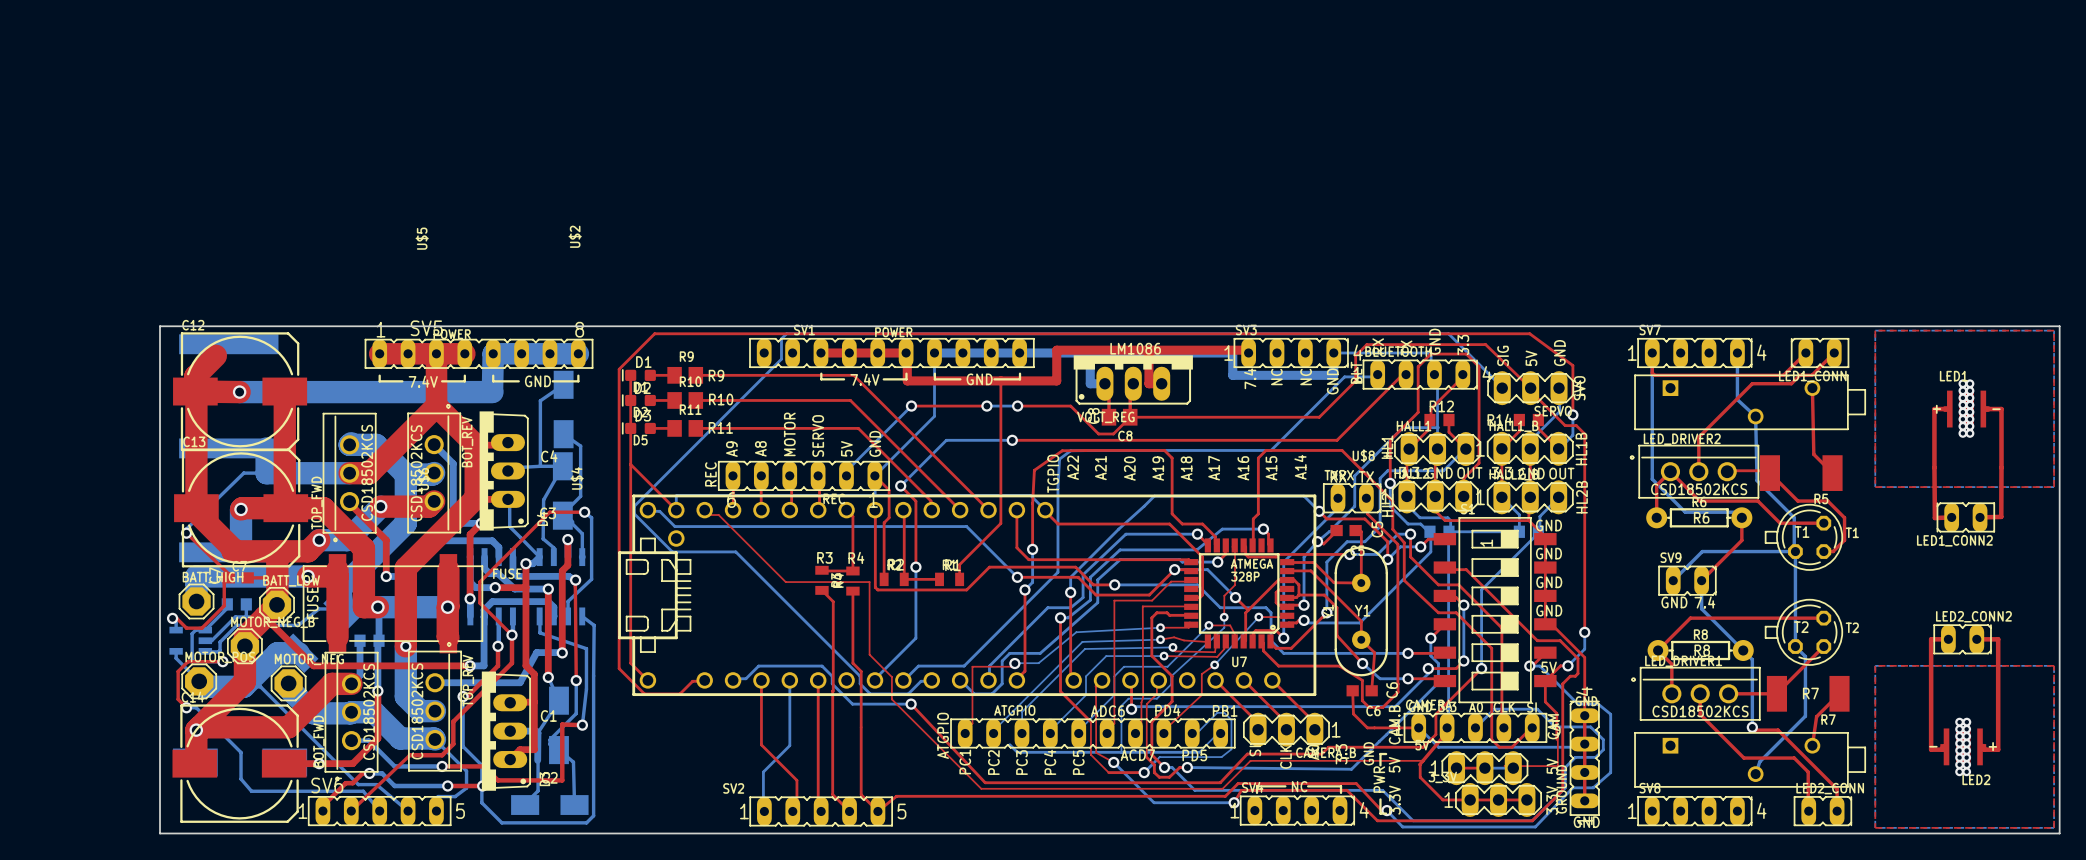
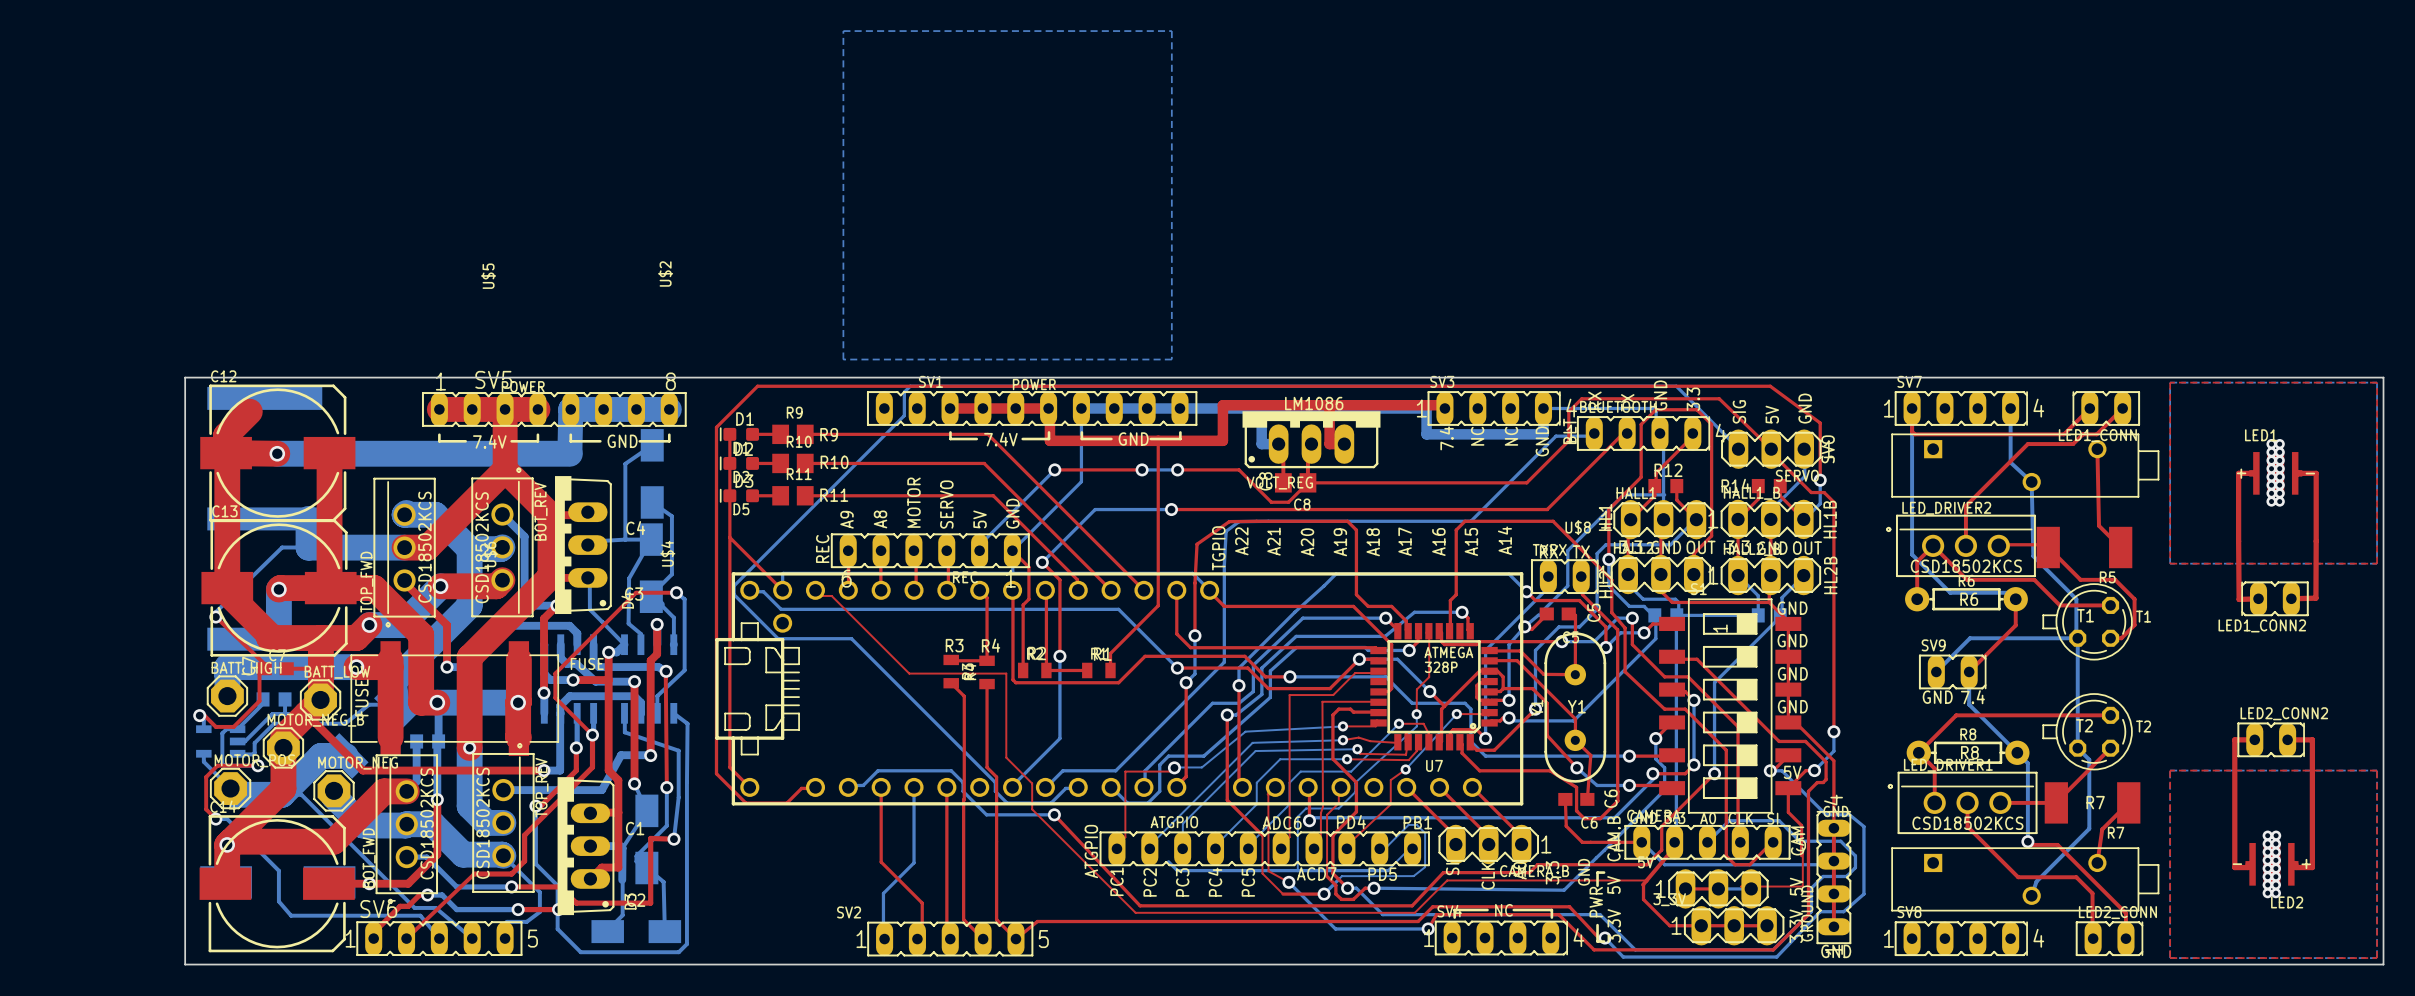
bottom zone outline: none -> (843, 31) (843, 359) (1171, 359) (1171, 31) (843, 31)

